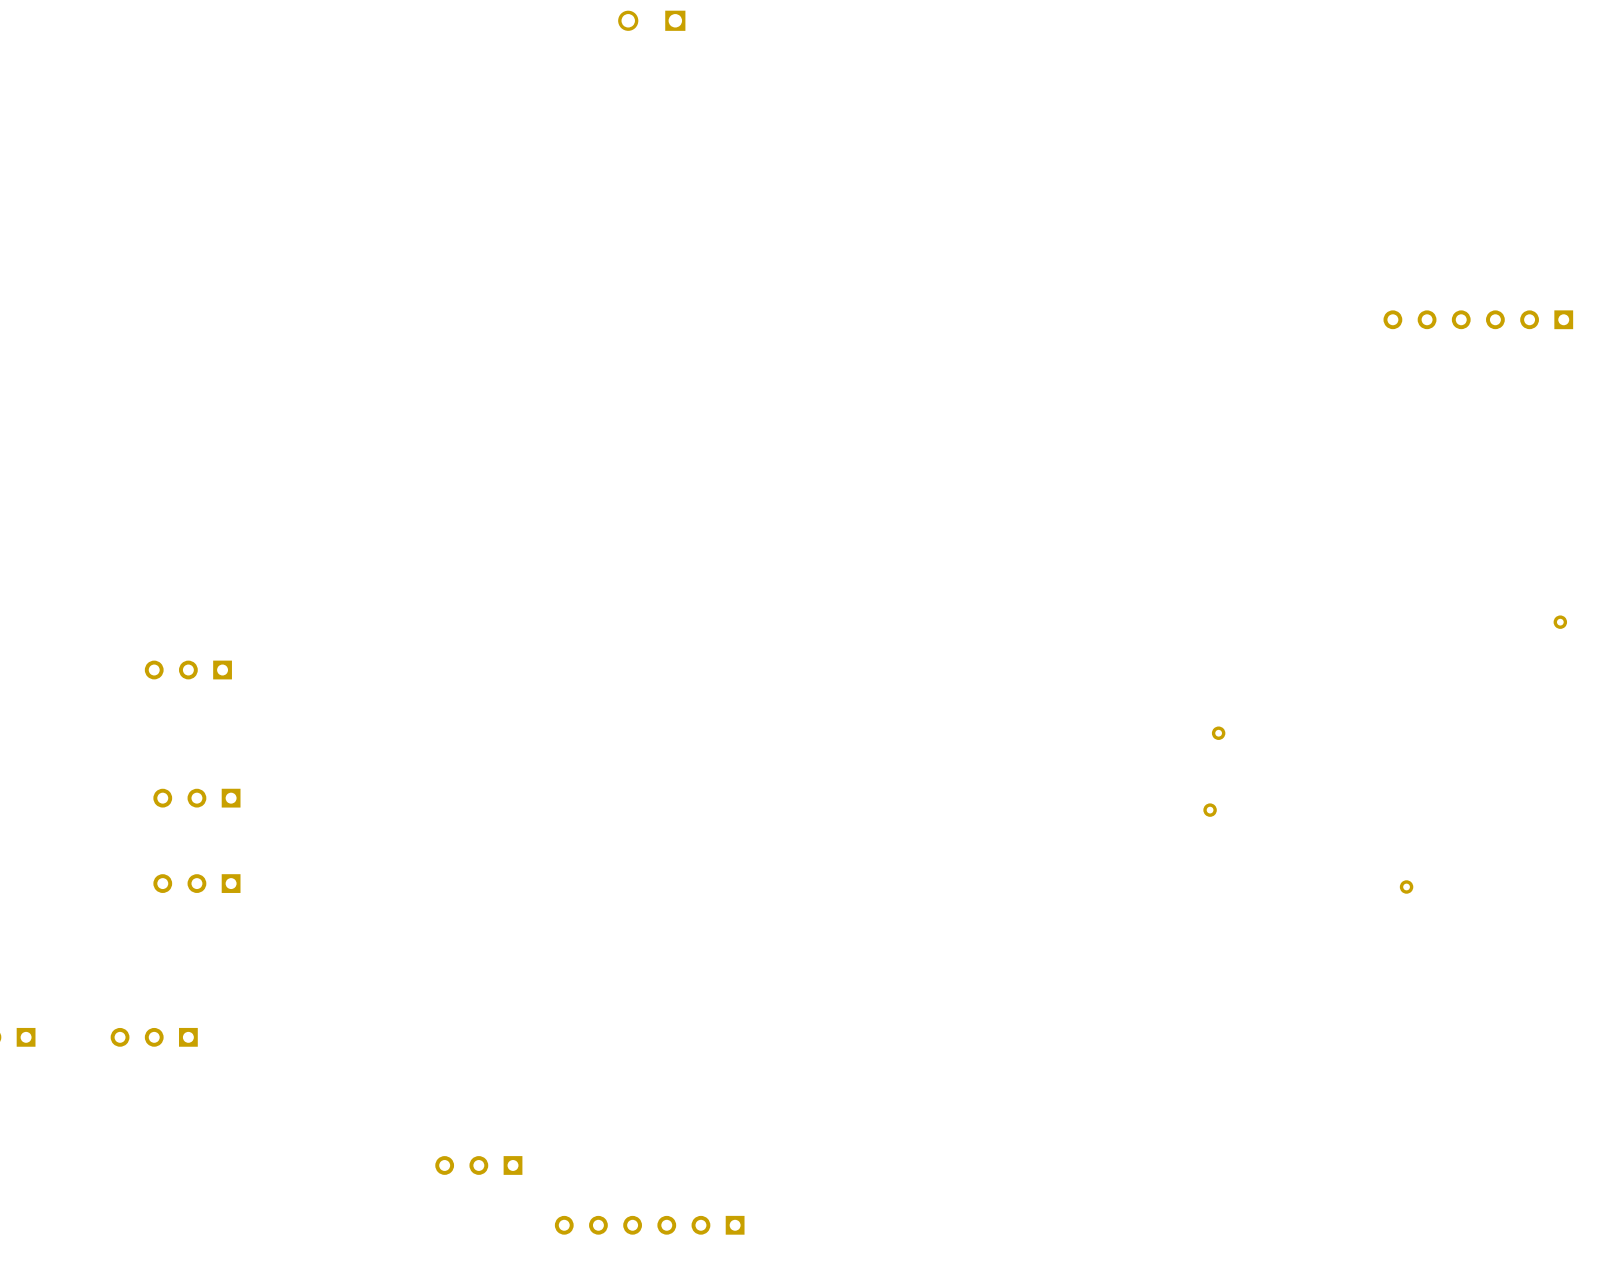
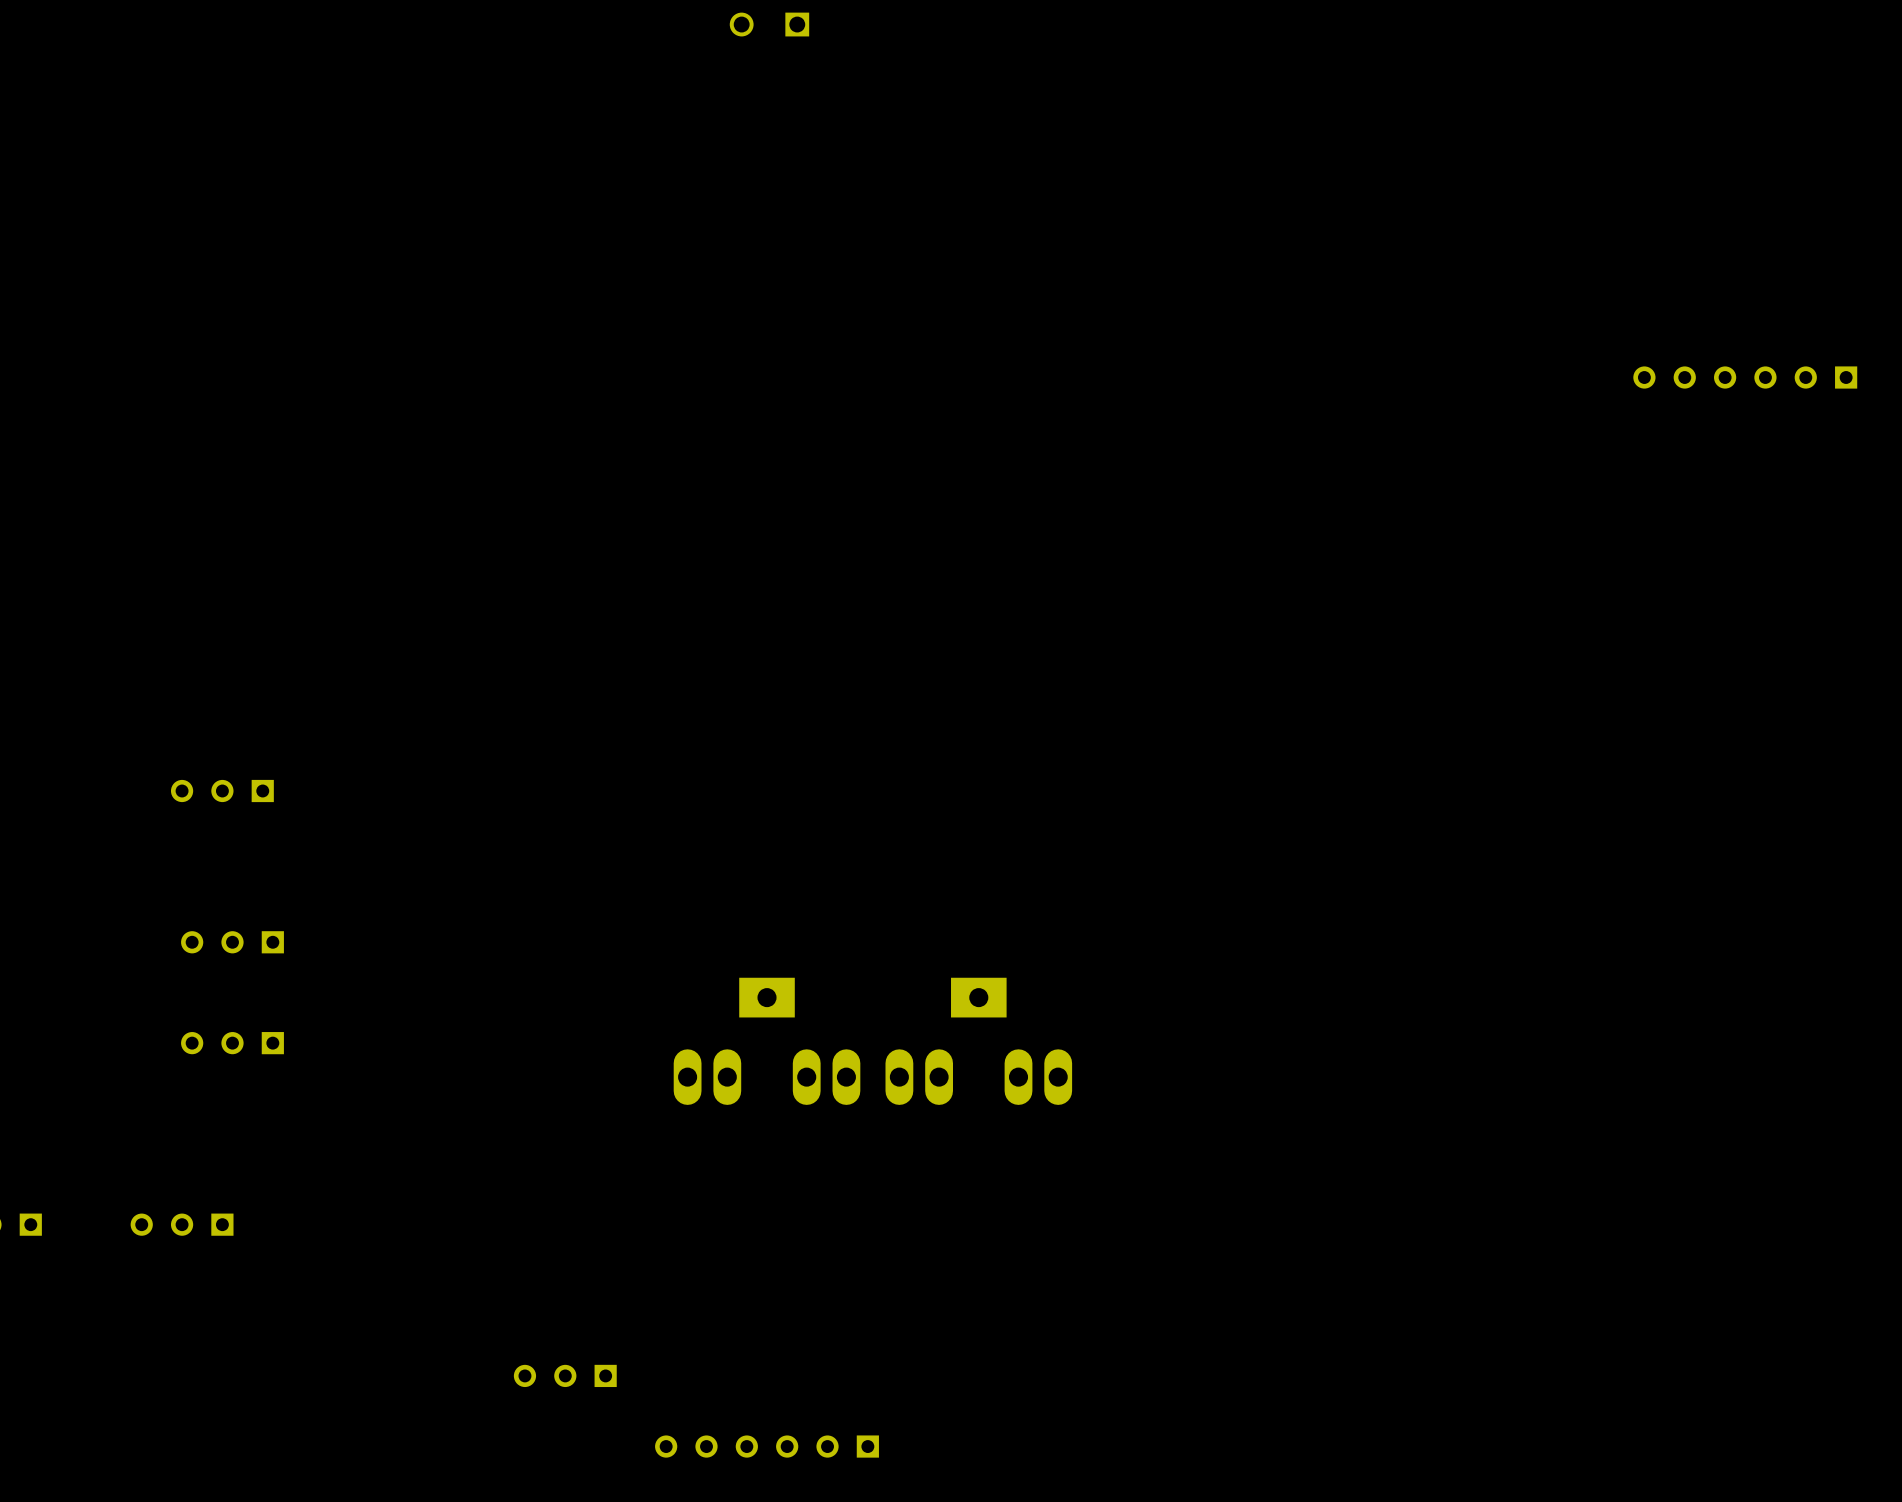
part: (1560, 622) -> none
part: (1218, 733) -> none
part: (1210, 810) -> none
part: none -> (767, 1041)
part: none -> (978, 1041)
part: (1406, 886) -> none

